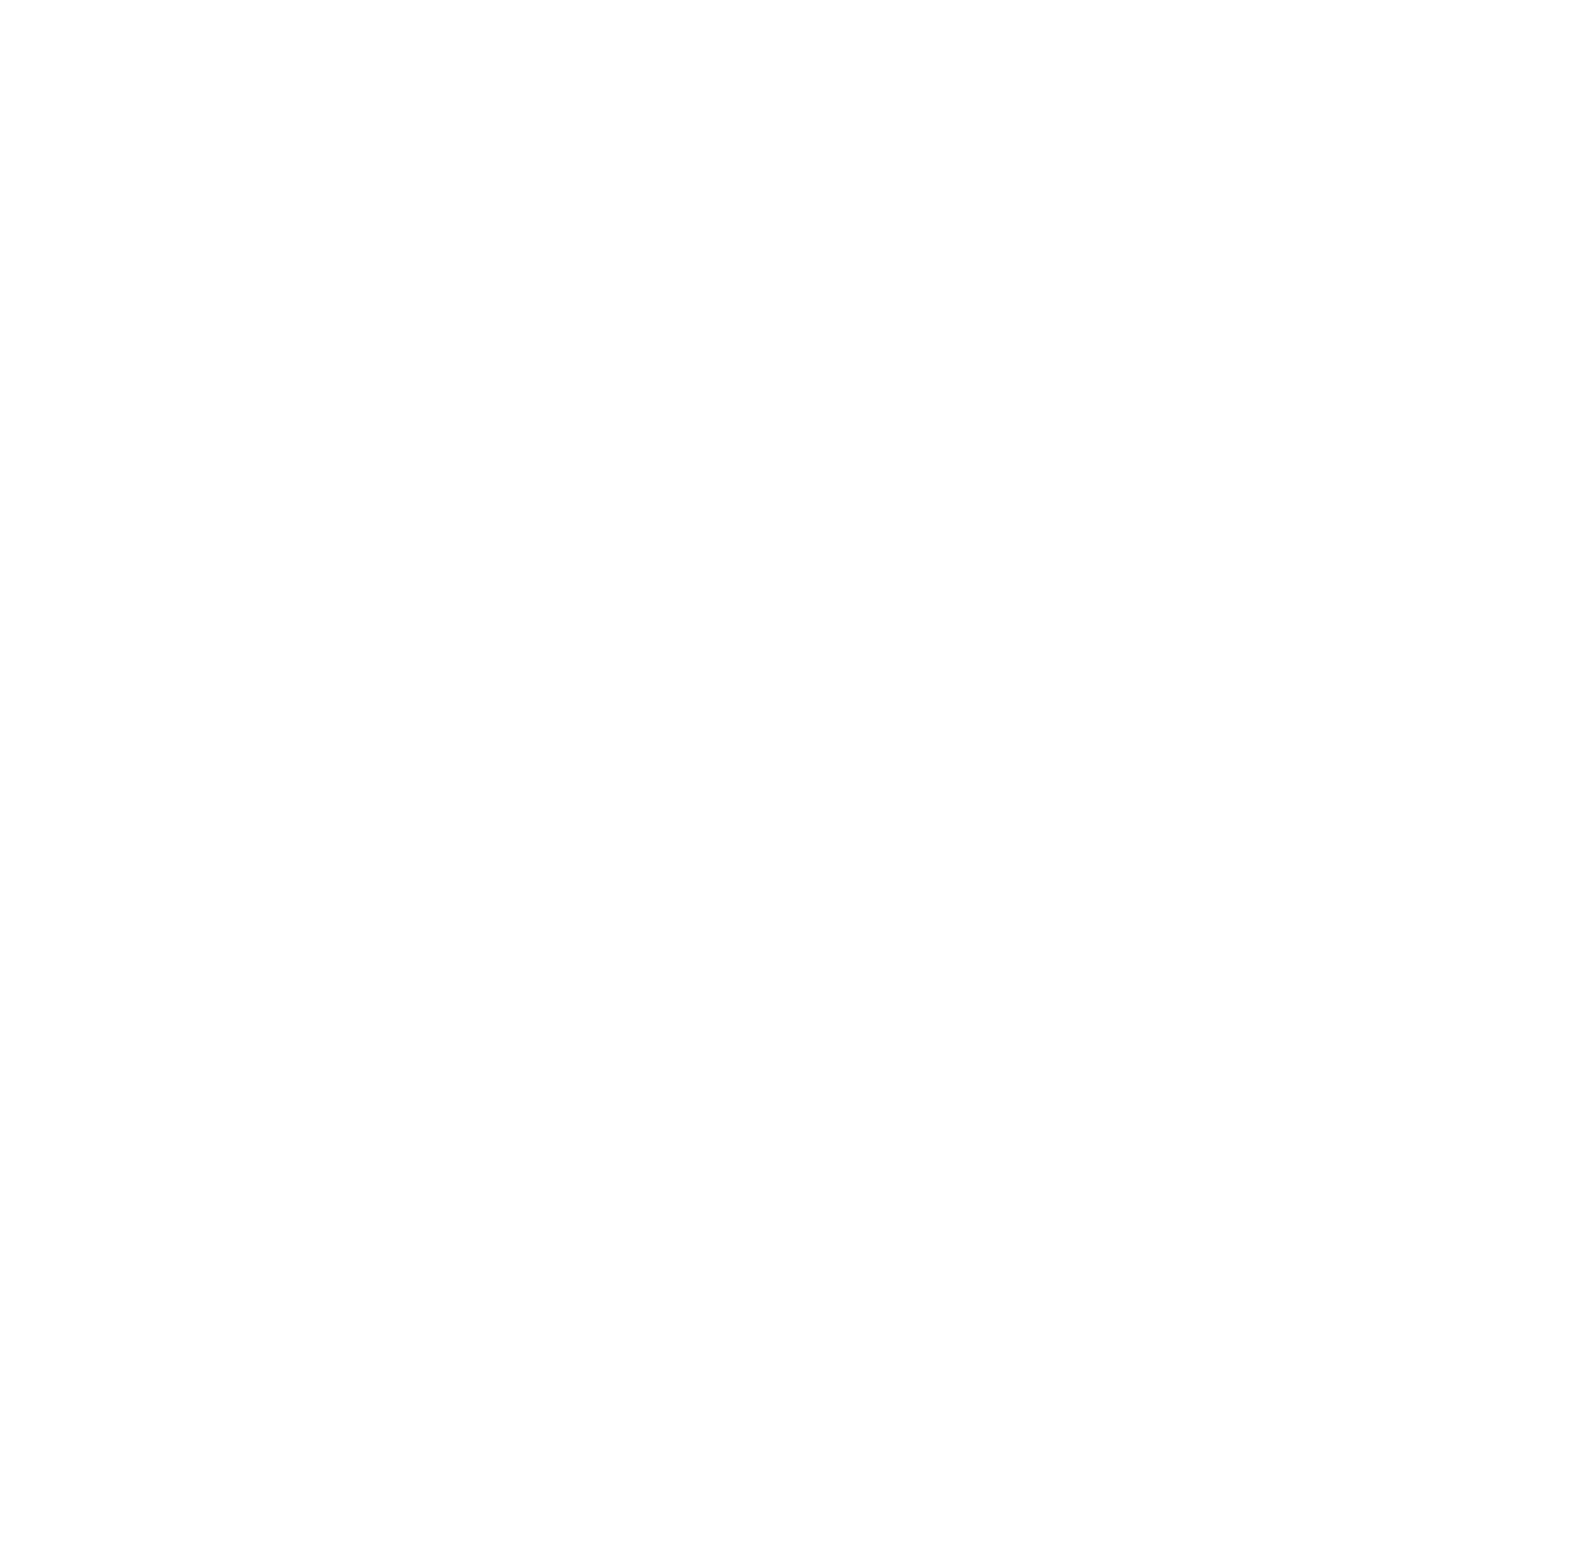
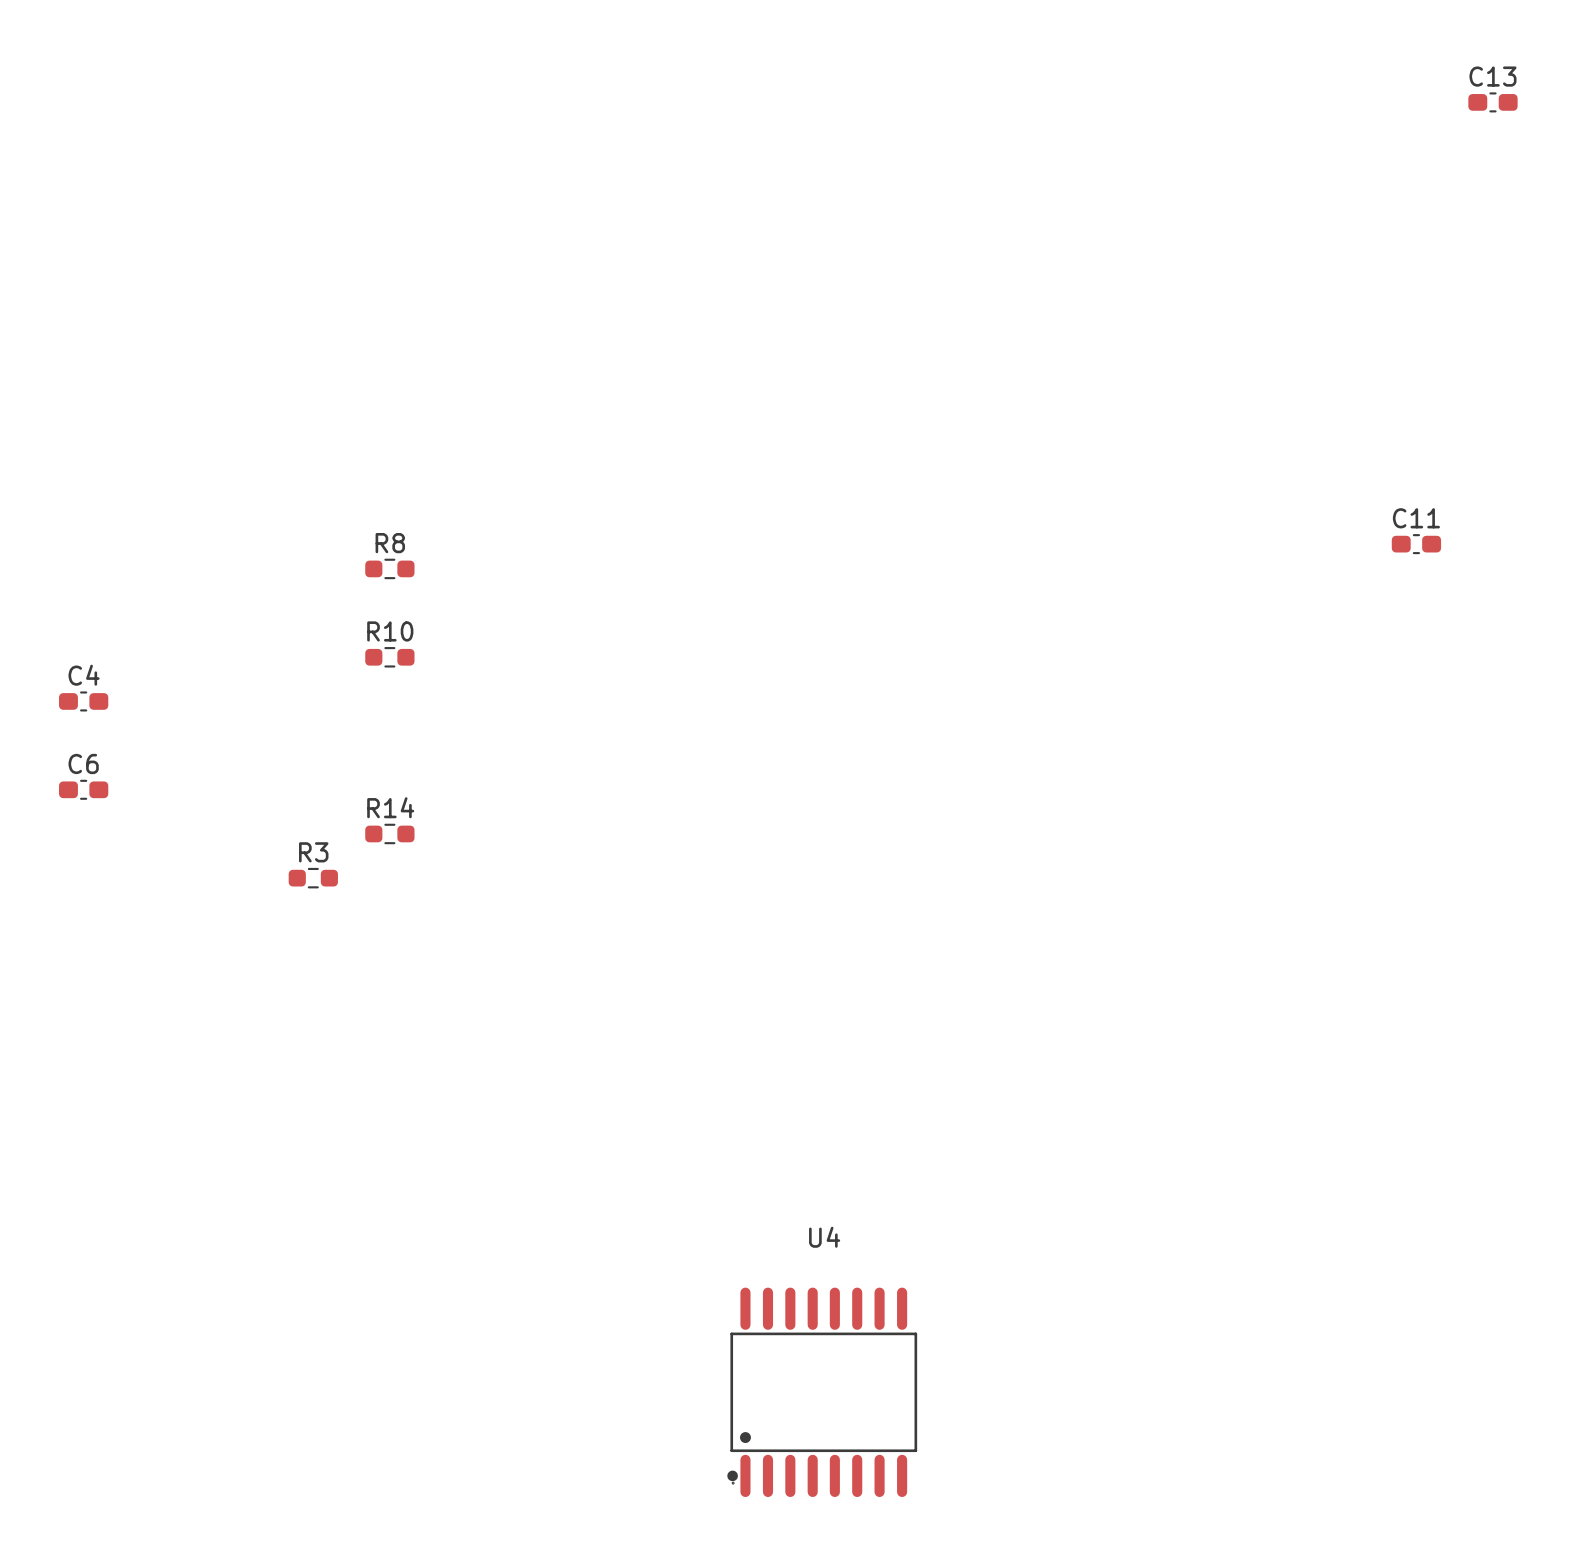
C13: none -> (1492, 102)
C11: none -> (1416, 544)
R8: none -> (389, 568)
R10: none -> (389, 657)
C4: none -> (83, 701)
C6: none -> (83, 789)
R14: none -> (389, 833)
R3: none -> (313, 878)
U4: none -> (822, 1392)

